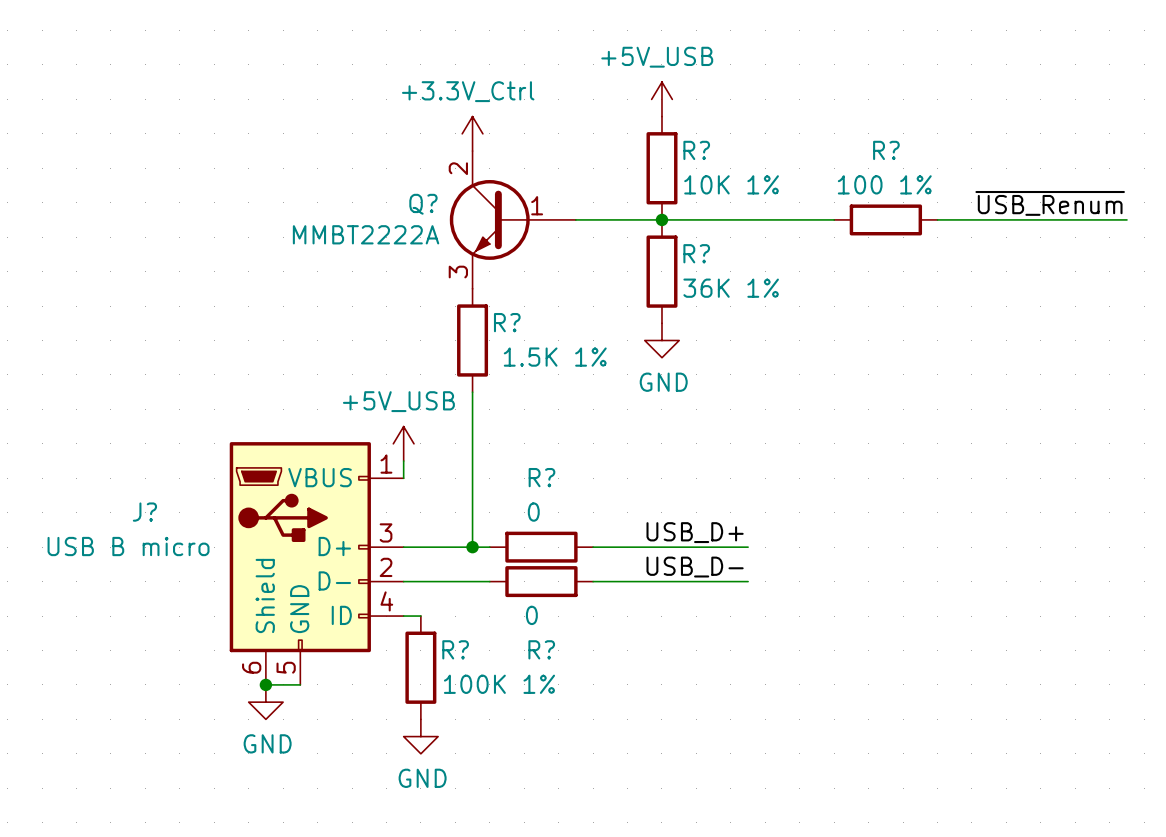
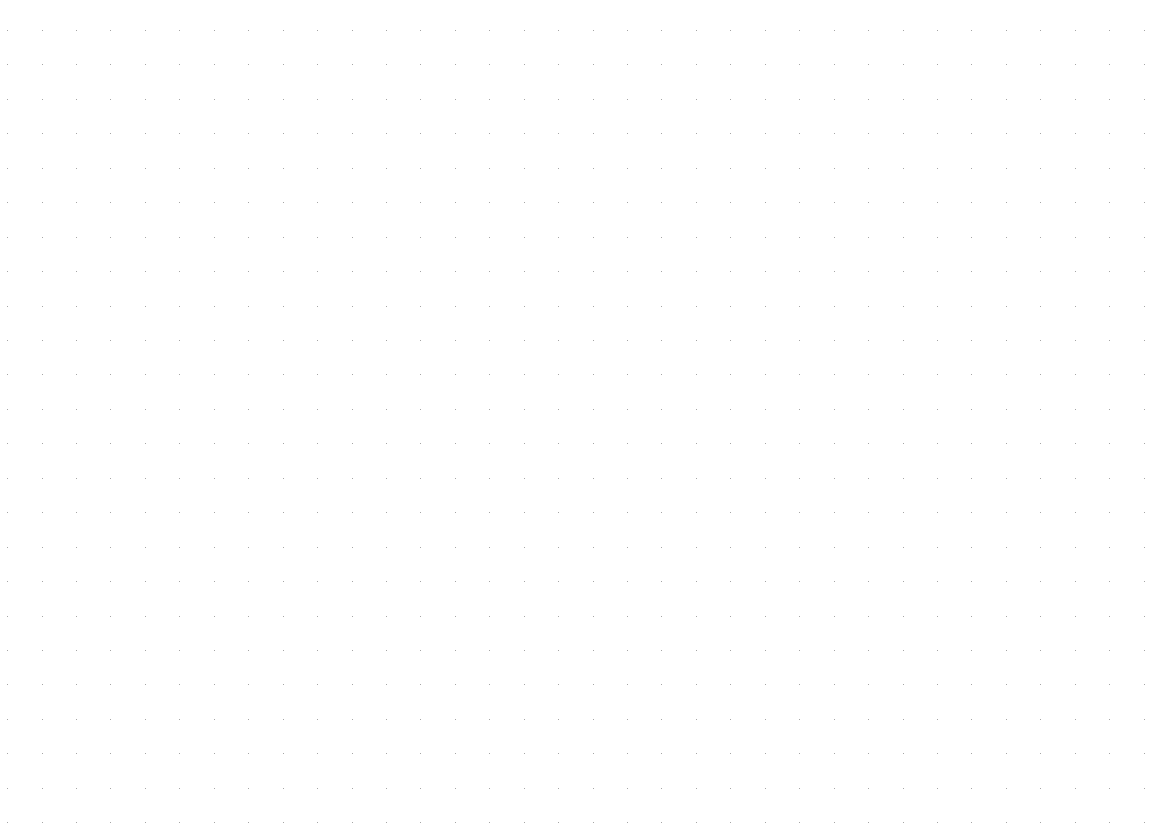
power symbol: +5V_USB (661, 99) -> none
power symbol: +3.3V_Ctrl (472, 133) -> none
R?: 10K 1% (661, 168) -> none
label: ~{USB_Renum} (1050, 203) -> none
Q?: MMBT2222A (512, 219) -> none
wire: (575, 219) (834, 219) -> none
junction: (661, 219) -> none
R?: 100 1% (885, 219) -> none
wire: (937, 219) (1126, 219) -> none
R?: 36K 1% (661, 271) -> none
R?: 1.5K 1% (472, 340) -> none
power symbol: GND (661, 340) -> none
wire: (472, 392) (472, 547) -> none
power symbol: +5V_USB (403, 443) -> none
wire: (403, 461) (403, 478) -> none
label: USB_D+ (695, 532) -> none
wire: (403, 547) (489, 547) -> none
junction: (472, 547) -> none
R?: 0 (541, 547) -> none
wire: (593, 547) (748, 547) -> none
J?: USB B micro (316, 563) -> none
label: USB_D- (695, 567) -> none
wire: (403, 581) (489, 581) -> none
R?: 0 (541, 581) -> none
wire: (593, 581) (748, 581) -> none
wire: (403, 616) (420, 616) -> none
R?: 100K 1% (420, 667) -> none
wire: (265, 684) (300, 684) -> none
junction: (265, 684) -> none
power symbol: GND (265, 702) -> none
power symbol: GND (420, 736) -> none

